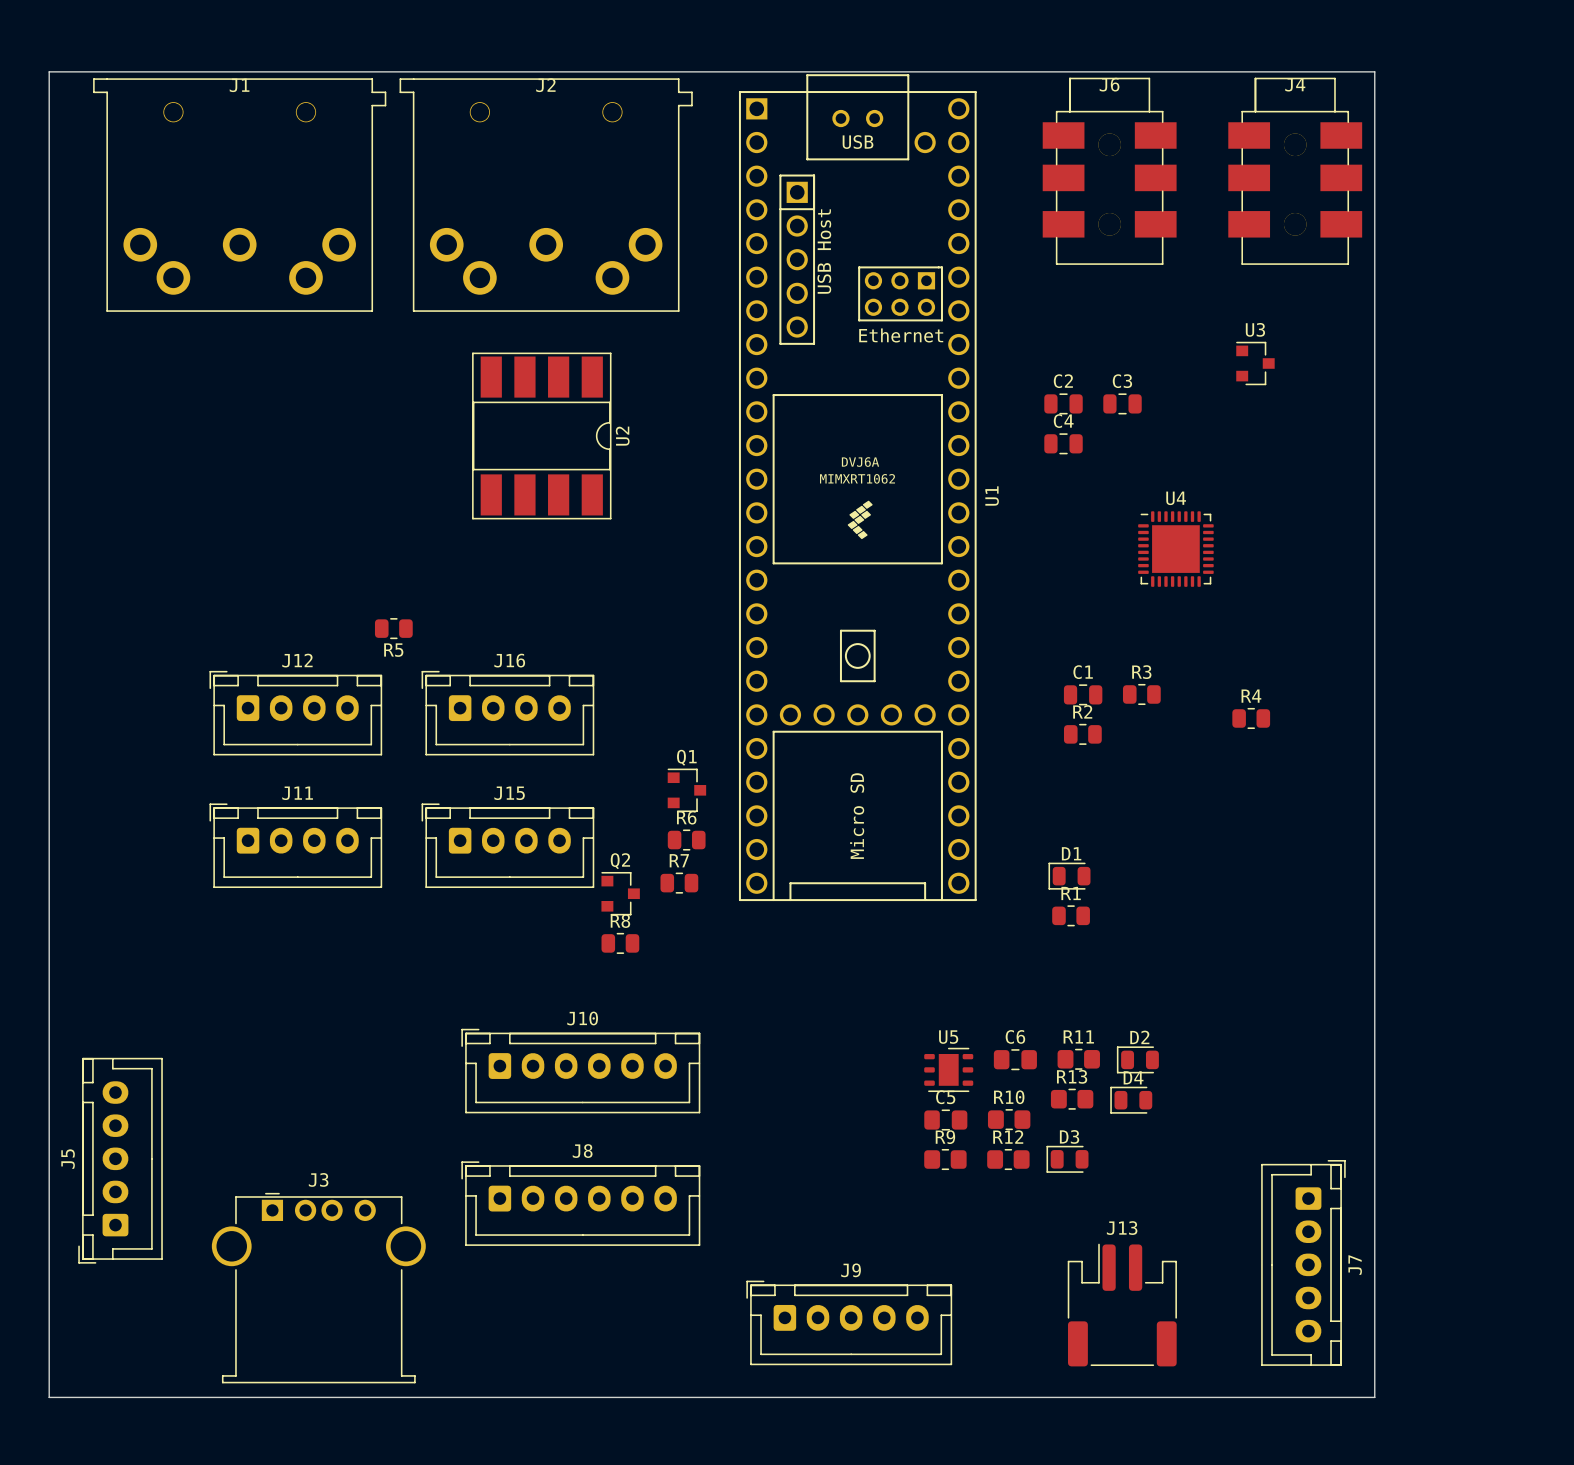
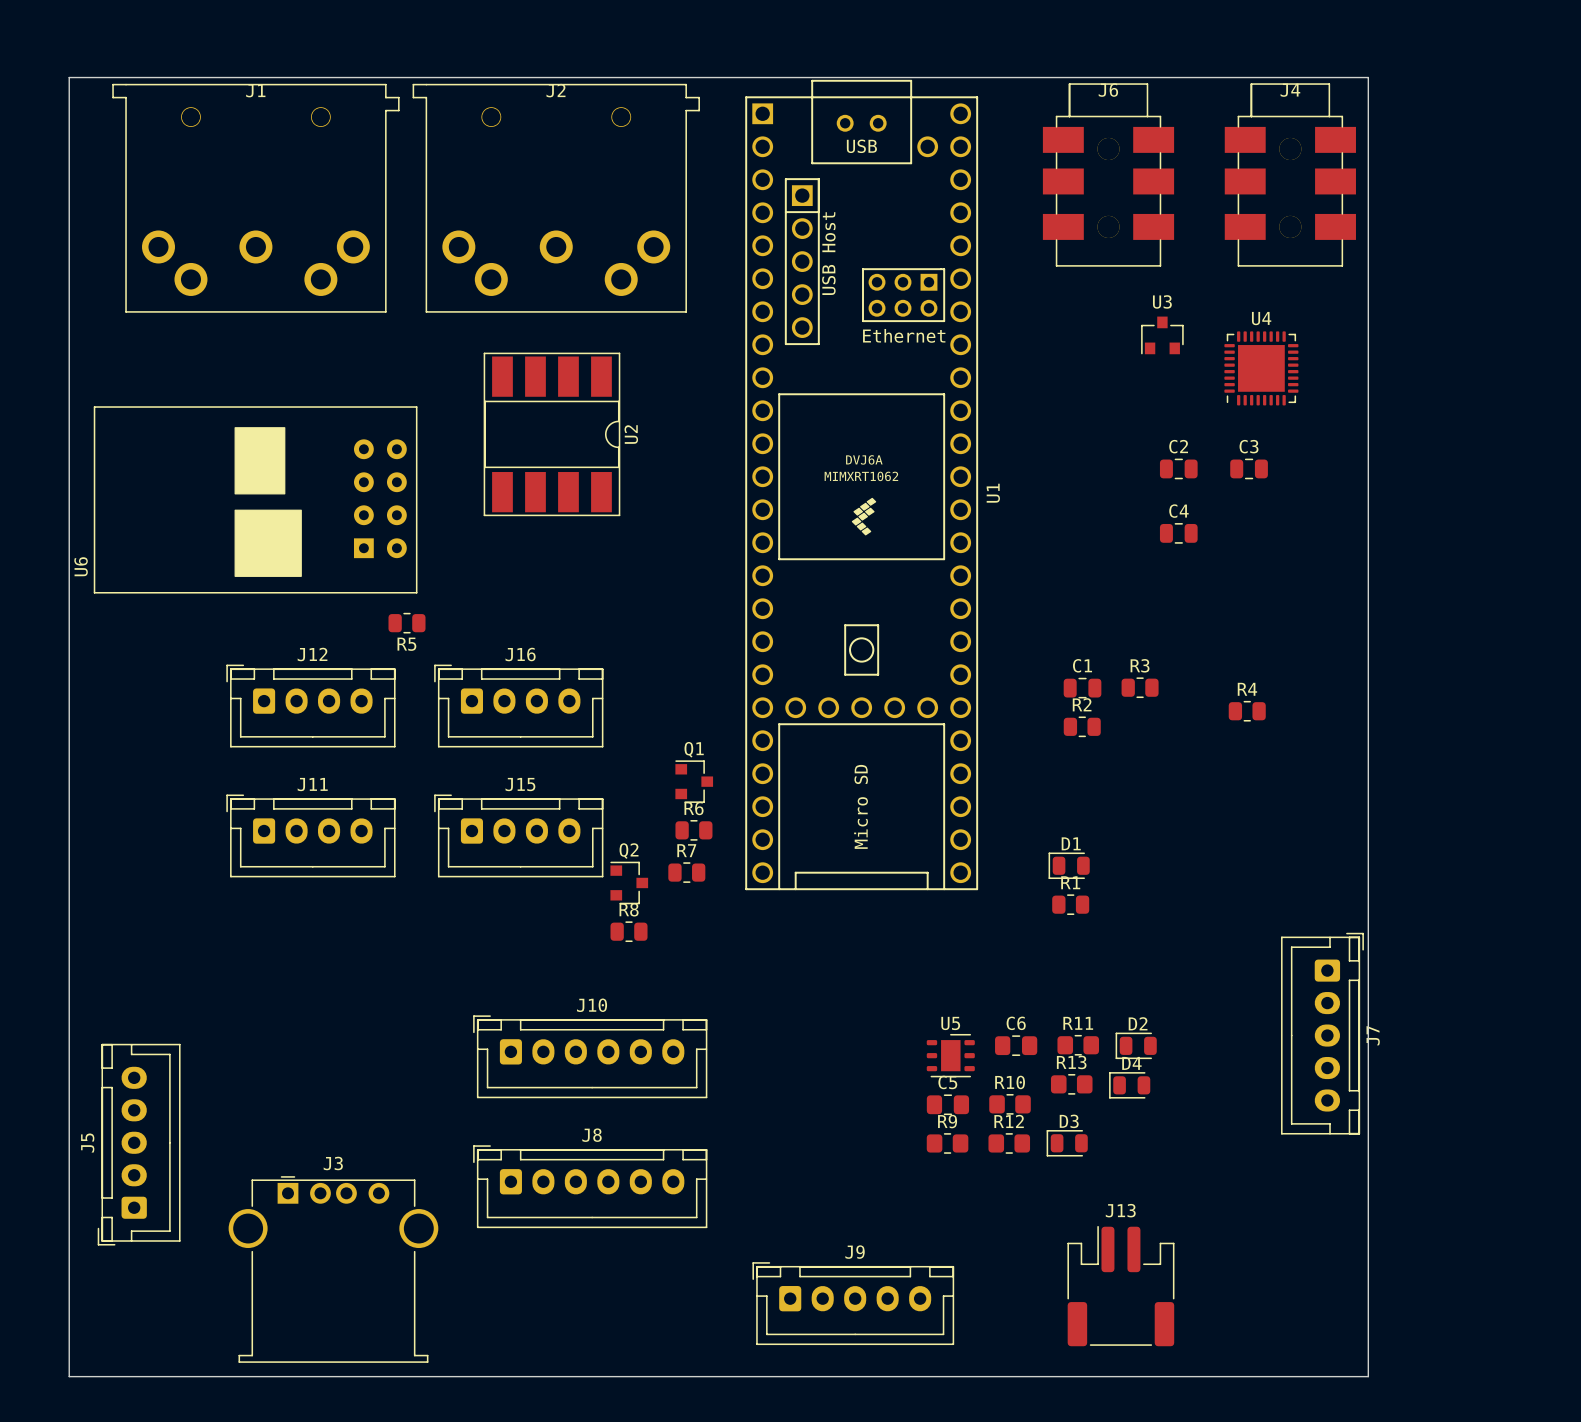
U3 rotation: 0° (1255, 363) -> 90° counterclockwise (1162, 335)
U3 position: (1255, 363) -> (1162, 335)
C2 position: (1063, 403) -> (1178, 468)
C3 position: (1122, 403) -> (1249, 468)
C4 position: (1063, 443) -> (1178, 533)
U6: none -> (255, 499)
U4 rotation: 0° (1175, 549) -> 90° counterclockwise (1261, 368)
U4 position: (1175, 549) -> (1261, 368)
J7 position: (1303, 1262) -> (1322, 1033)

